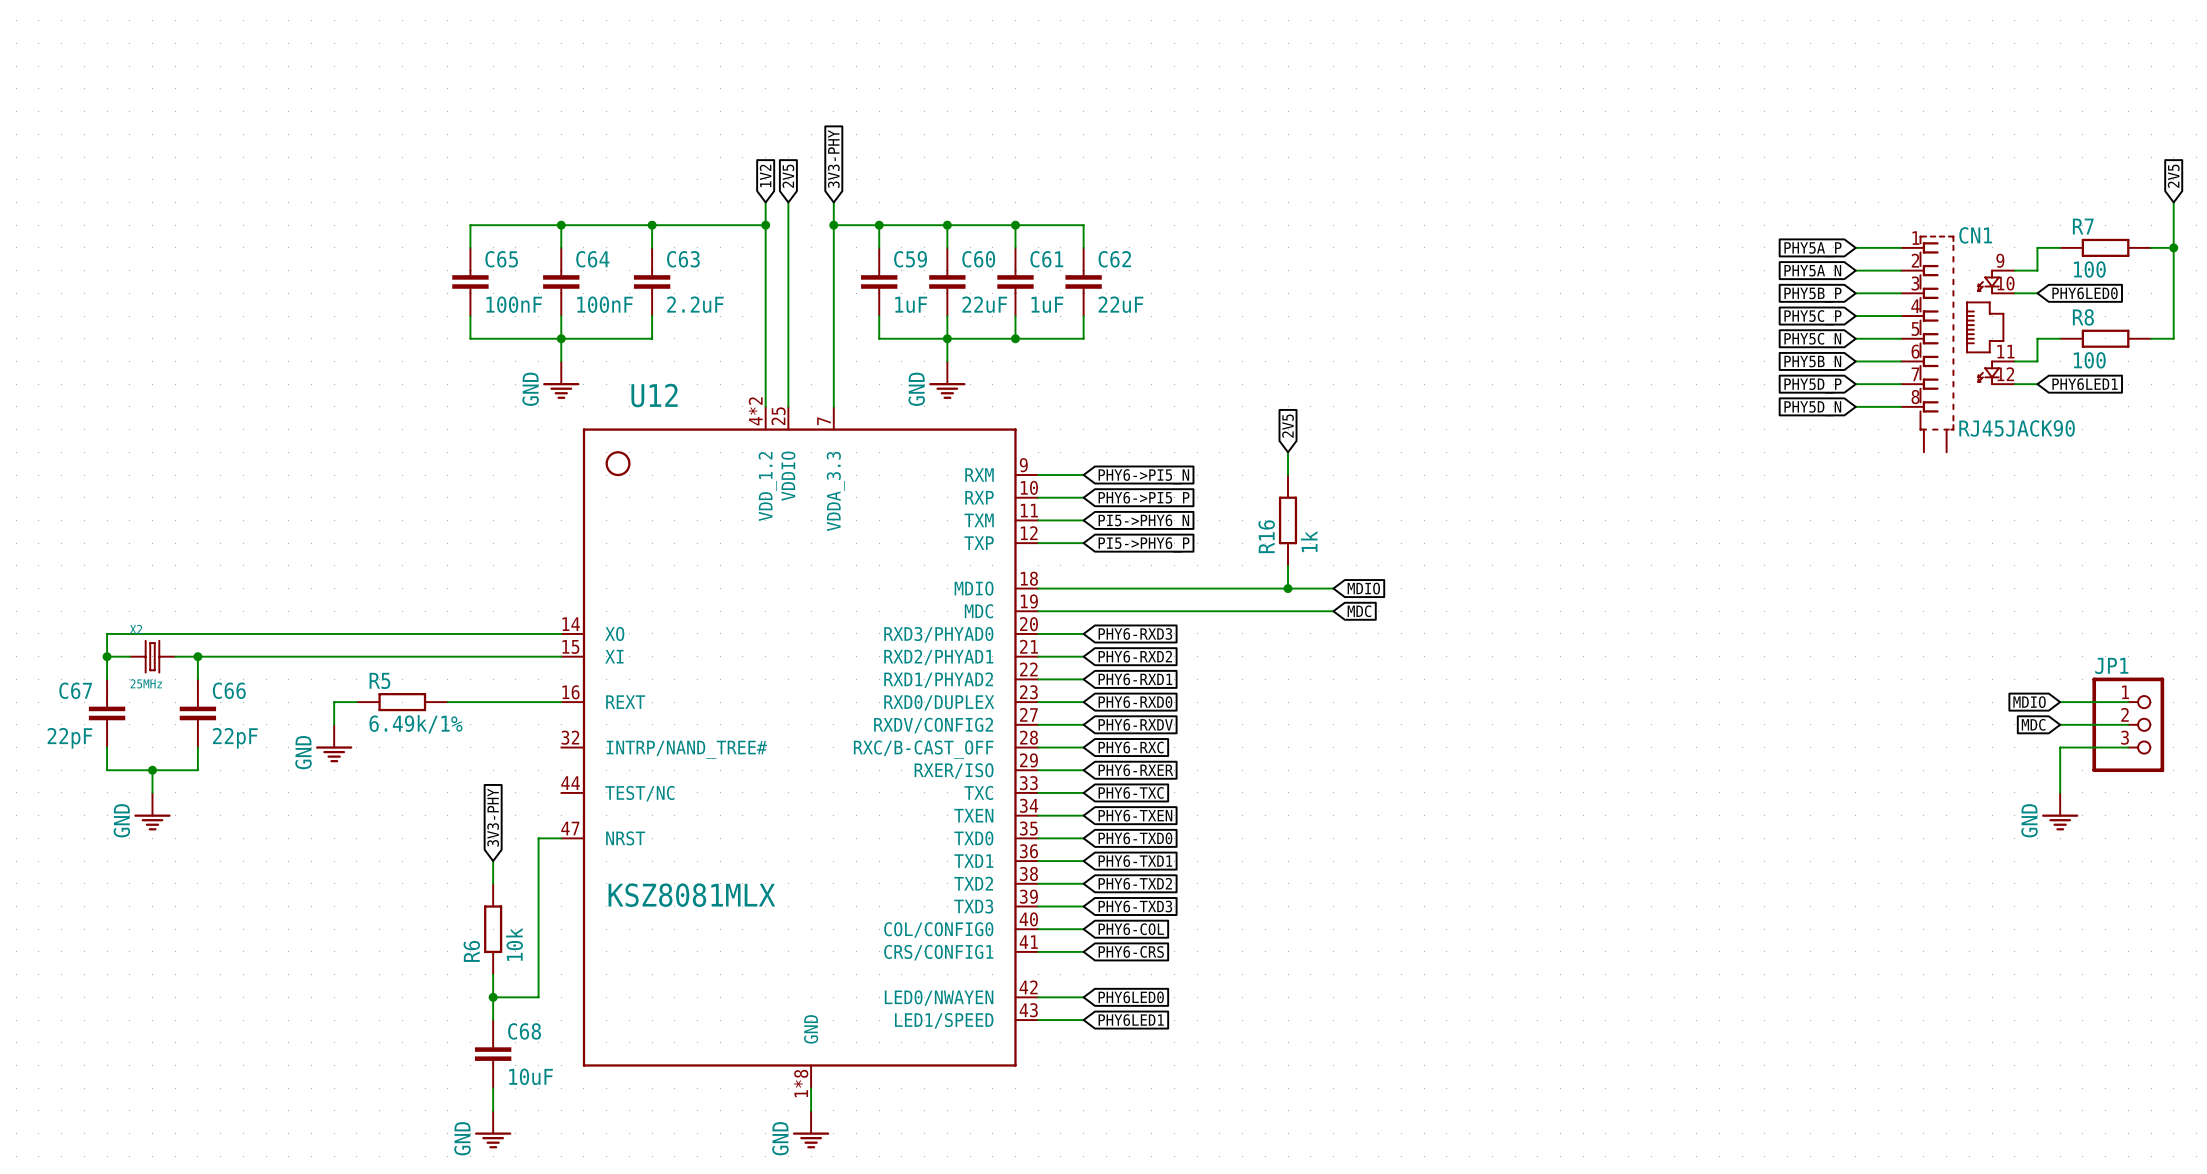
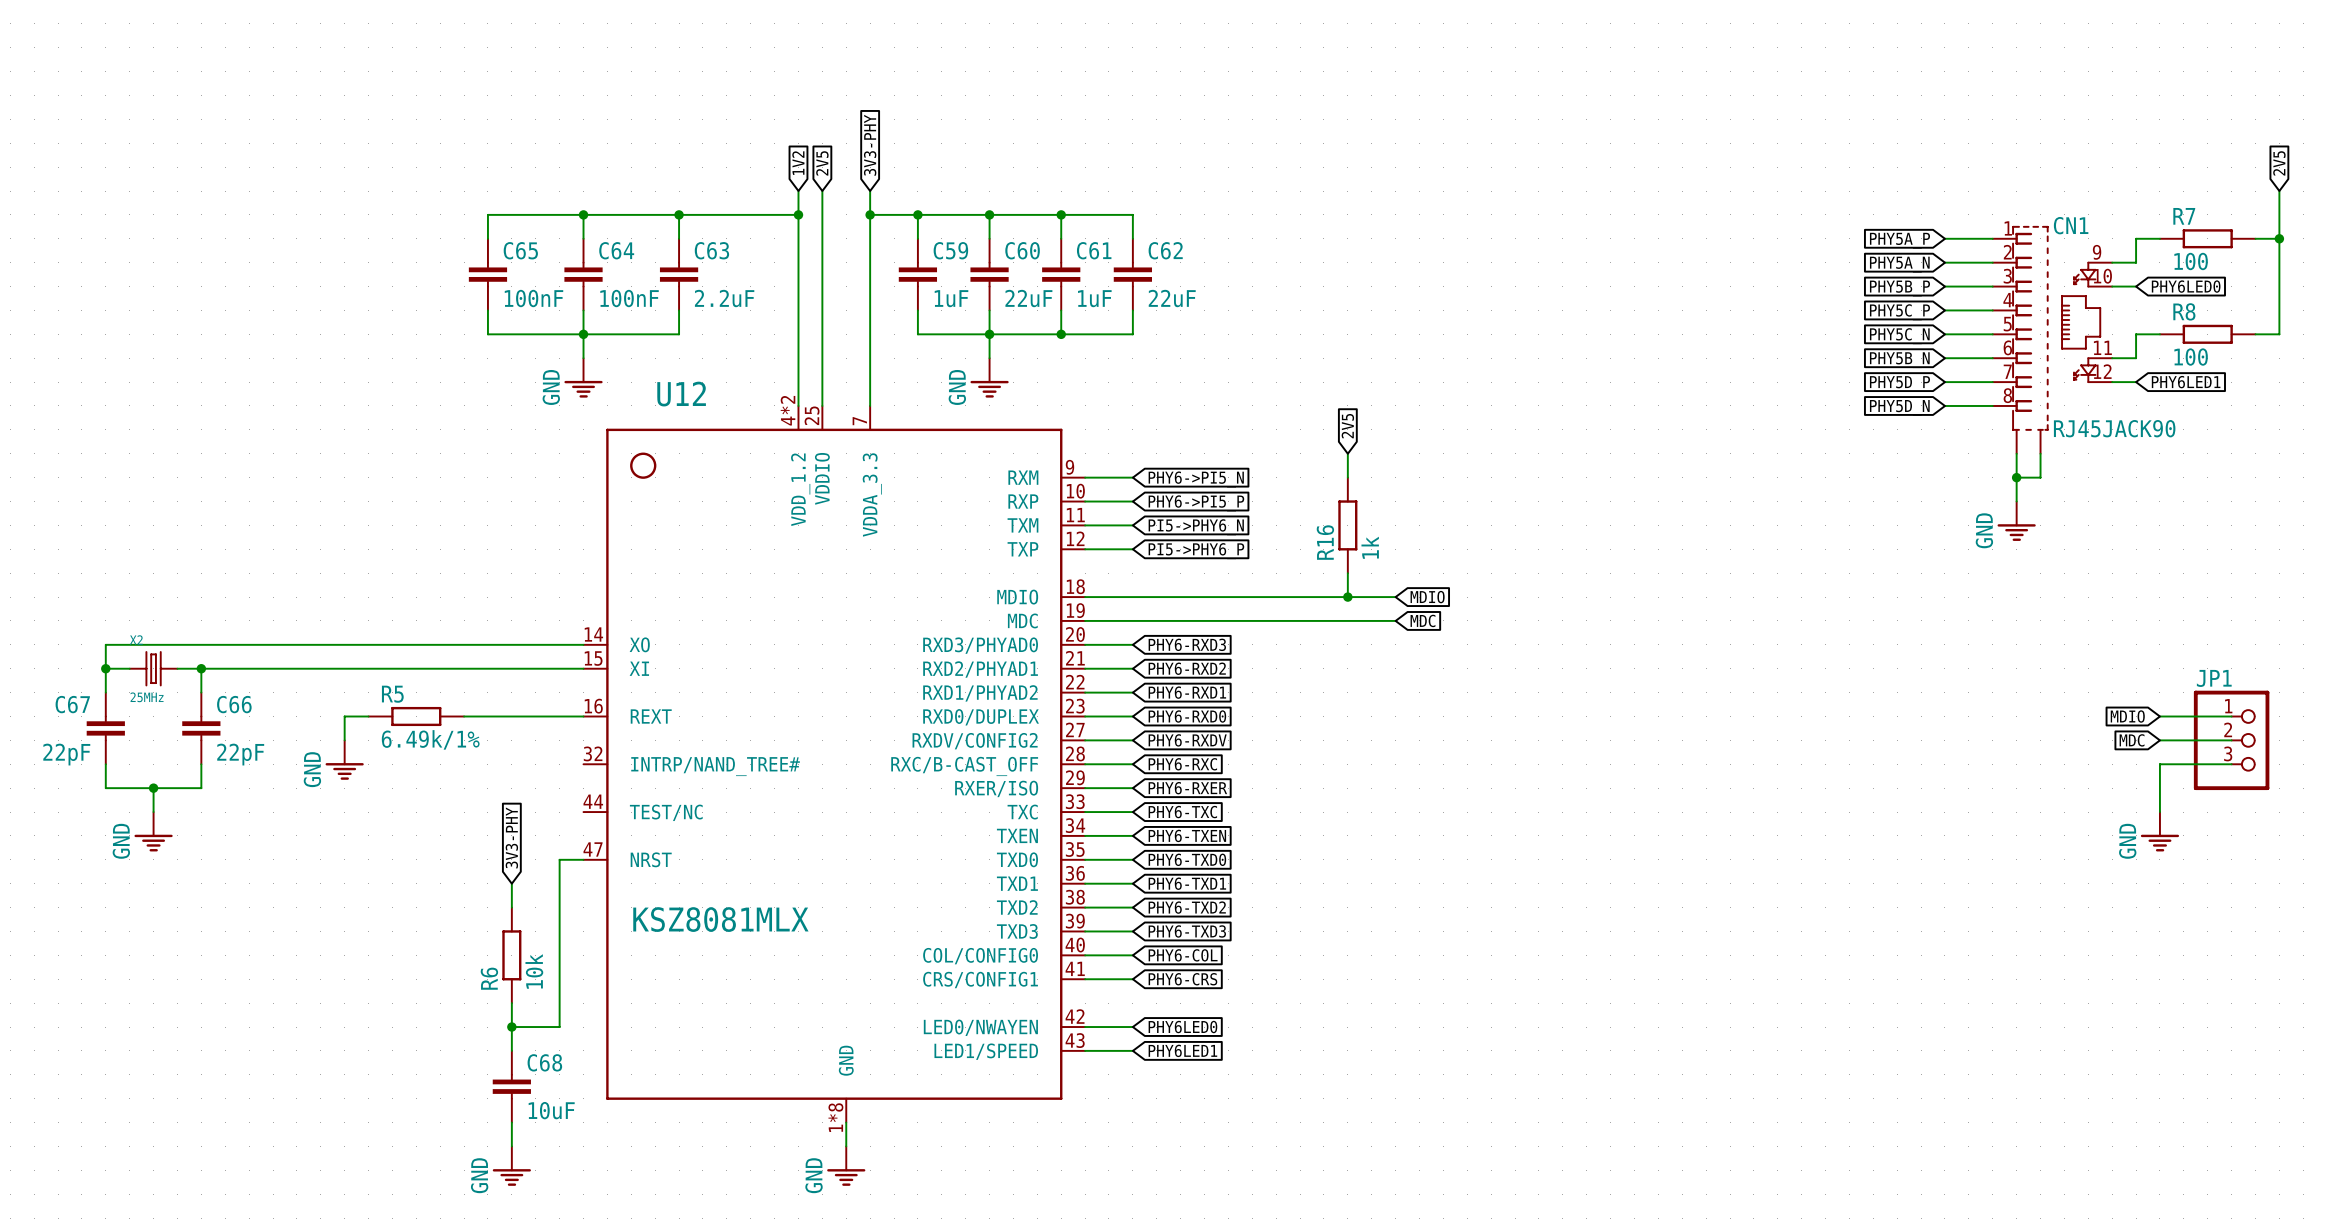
wire: none -> (2016, 453) (2016, 501)
wire: none -> (2040, 453) (2040, 477) (2016, 477)
junction: none -> (2016, 477)
power symbol: none -> GND (2016, 521)

